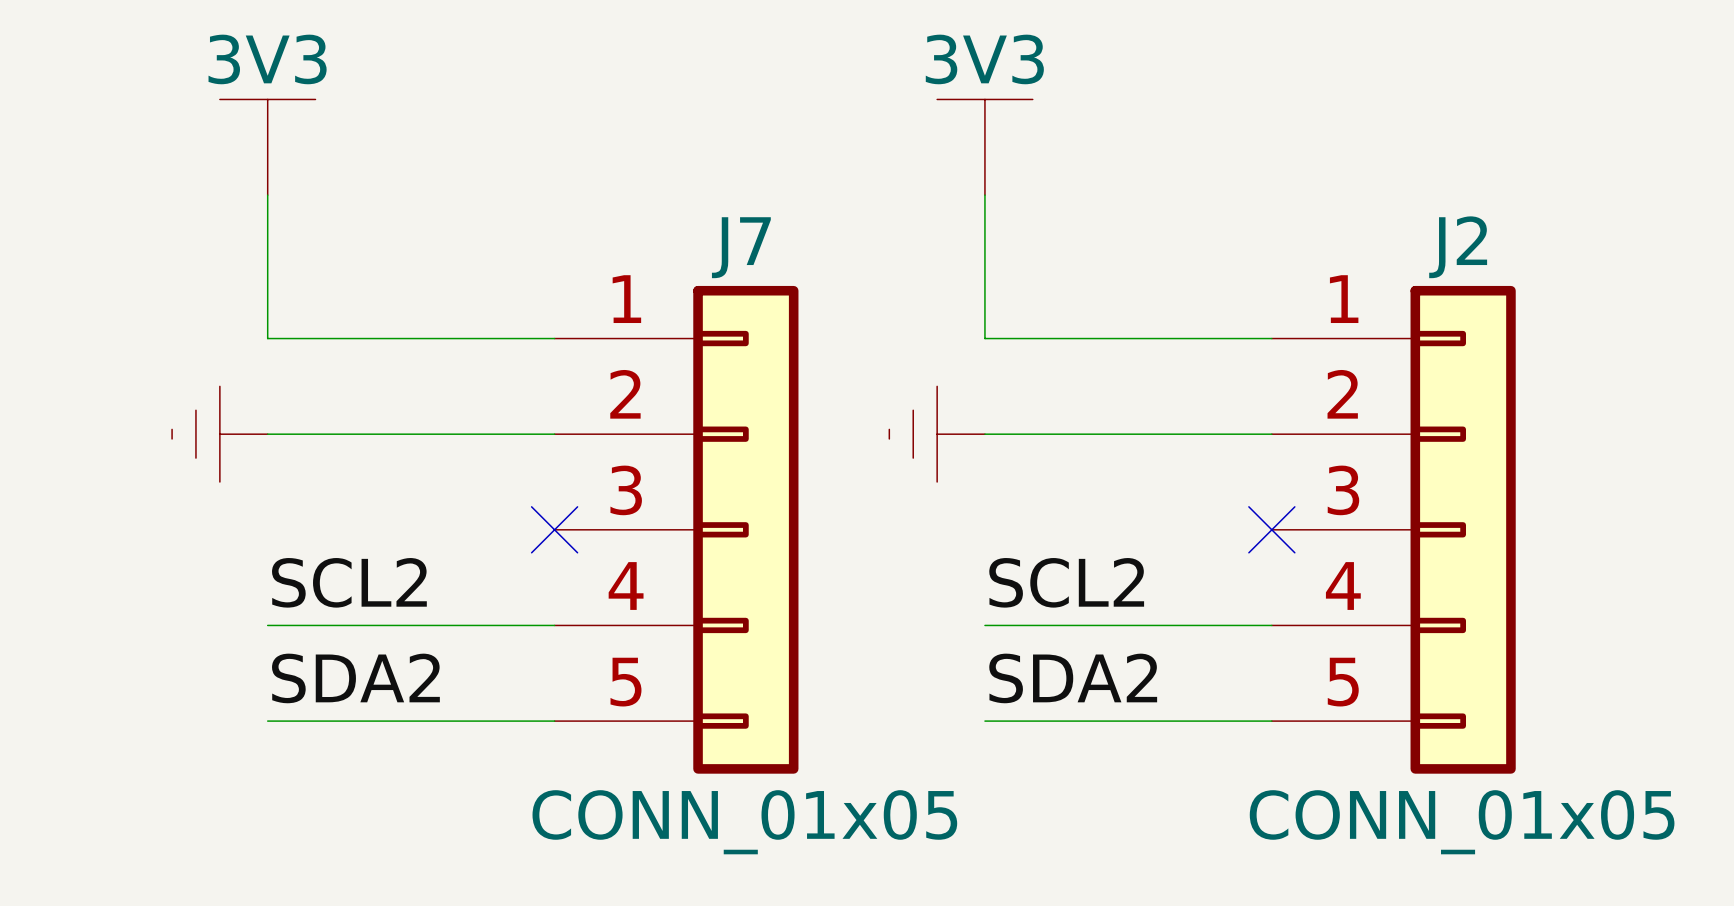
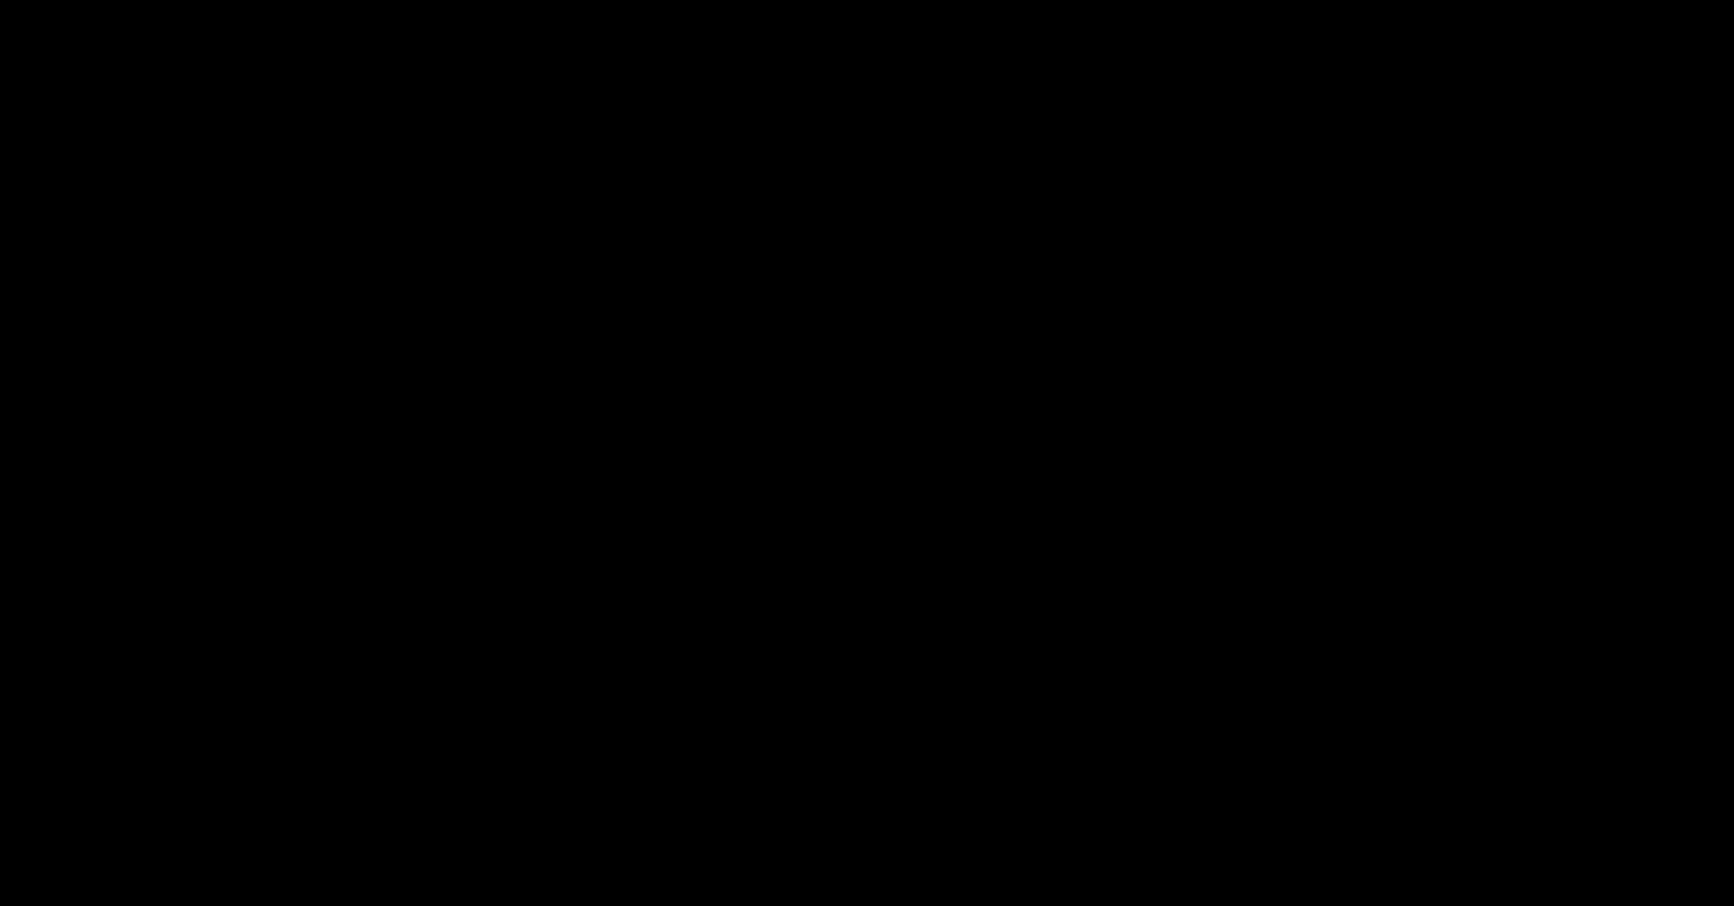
power symbol: 3V3 (267, 147) -> none
power symbol: 3V3 (984, 147) -> none
wire: (267, 195) (267, 338) (554, 338) -> none
wire: (984, 195) (984, 338) (1271, 338) -> none
power symbol: (219, 434) -> none
wire: (267, 434) (554, 434) -> none
power symbol: (937, 434) -> none
wire: (984, 434) (1271, 434) -> none
no-connect mark: (554, 529) -> none
J7: CONN_01x05 (676, 529) -> none
no-connect mark: (1271, 529) -> none
J2: CONN_01x05 (1393, 529) -> none
label: SCL2 (349, 582) -> none
label: SCL2 (1066, 582) -> none
wire: (267, 625) (554, 625) -> none
wire: (984, 625) (1271, 625) -> none
label: SDA2 (355, 678) -> none
label: SDA2 (1073, 678) -> none
wire: (267, 721) (554, 721) -> none
wire: (984, 721) (1271, 721) -> none

